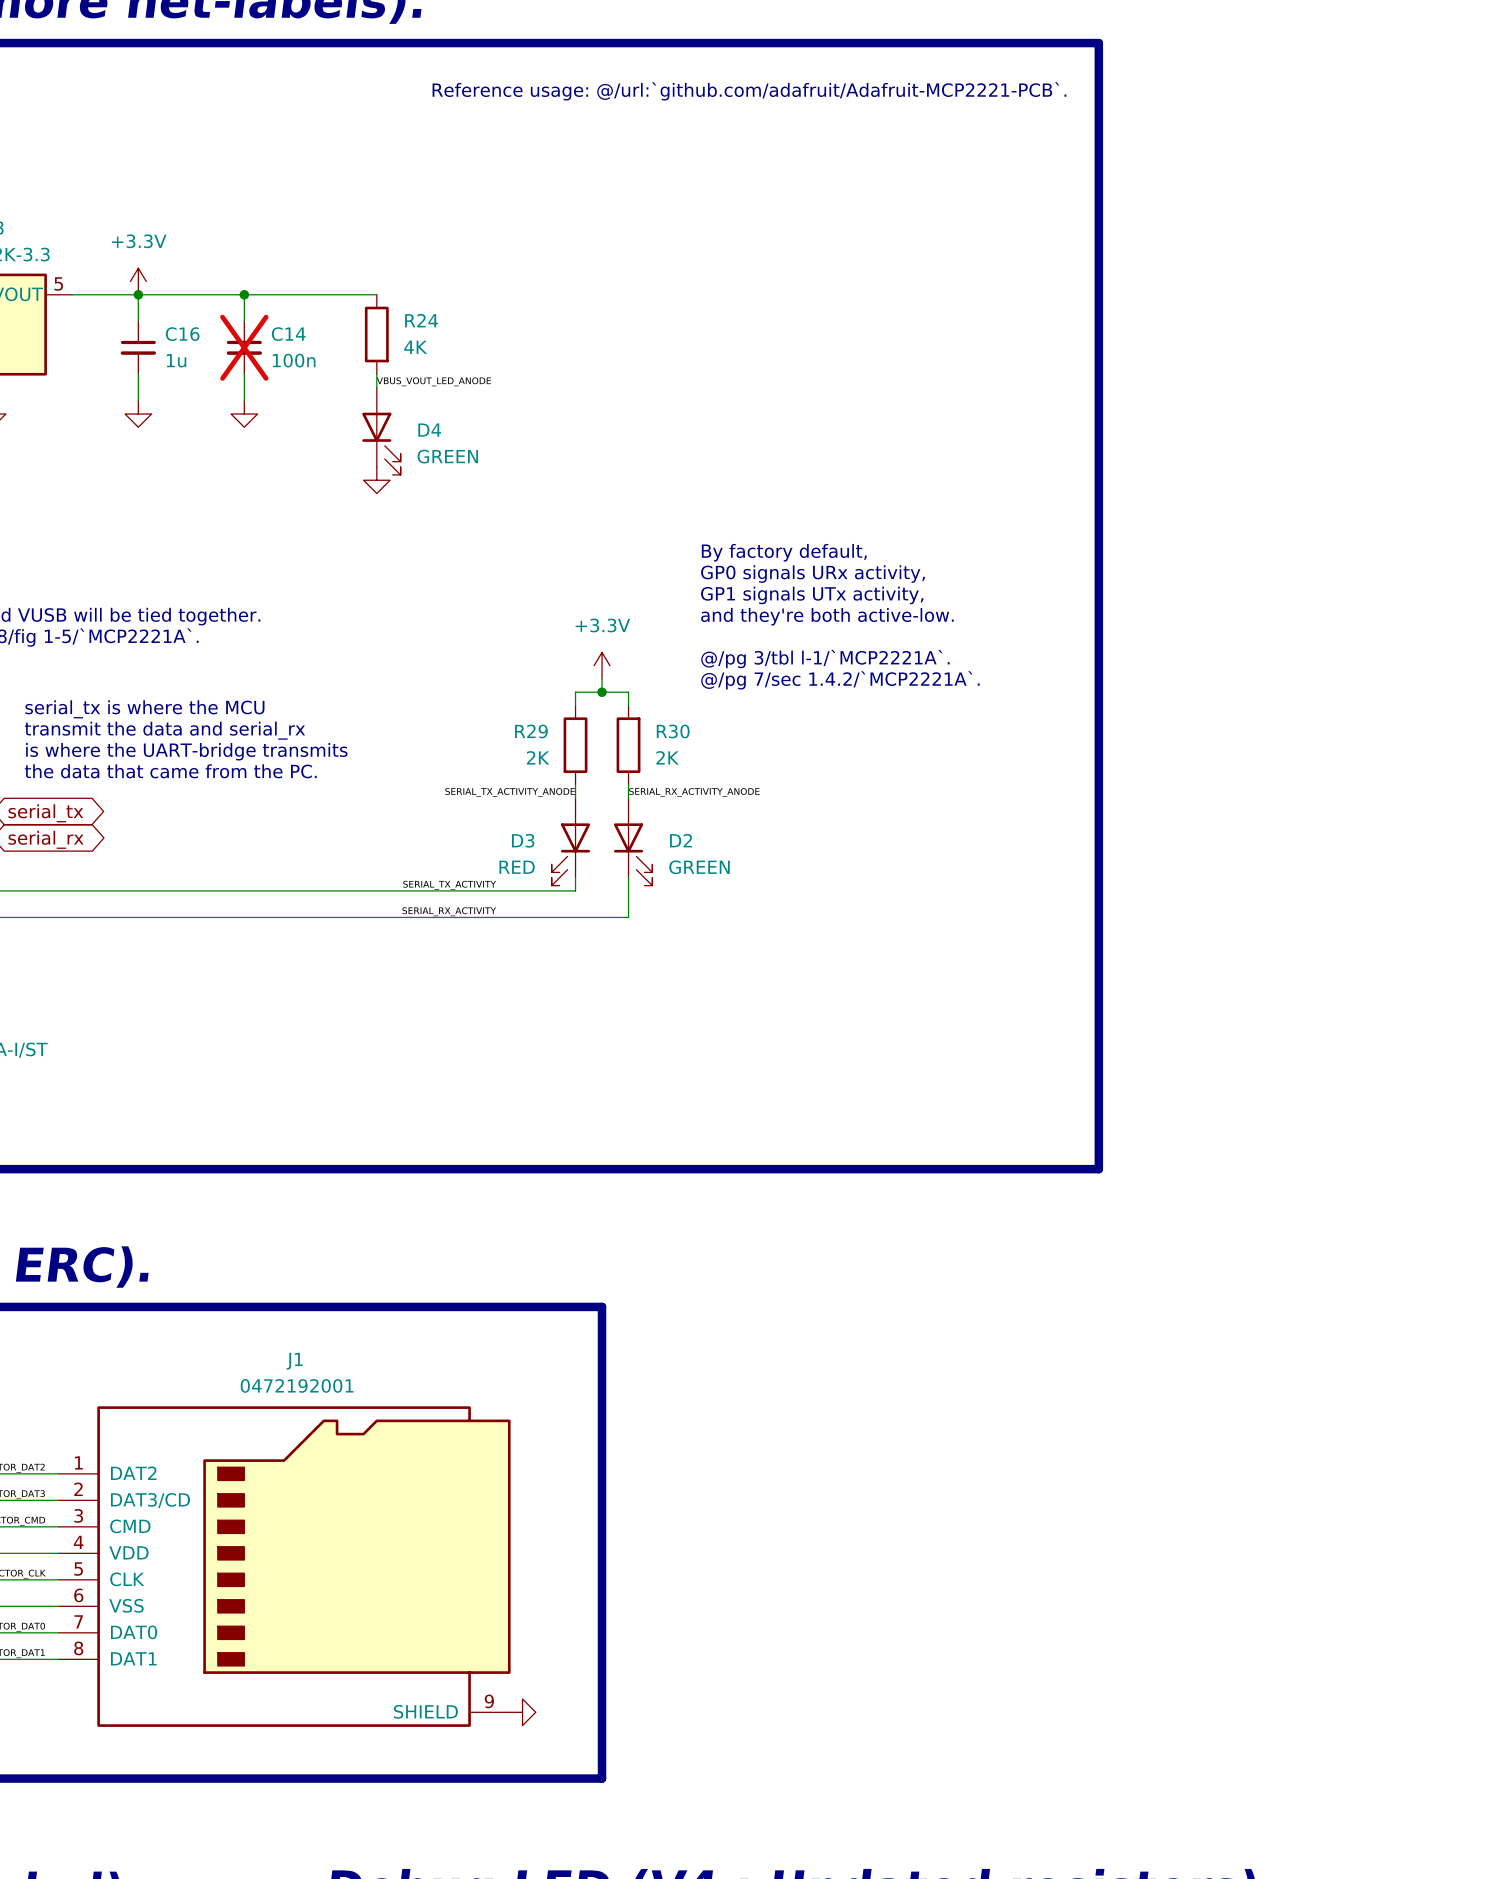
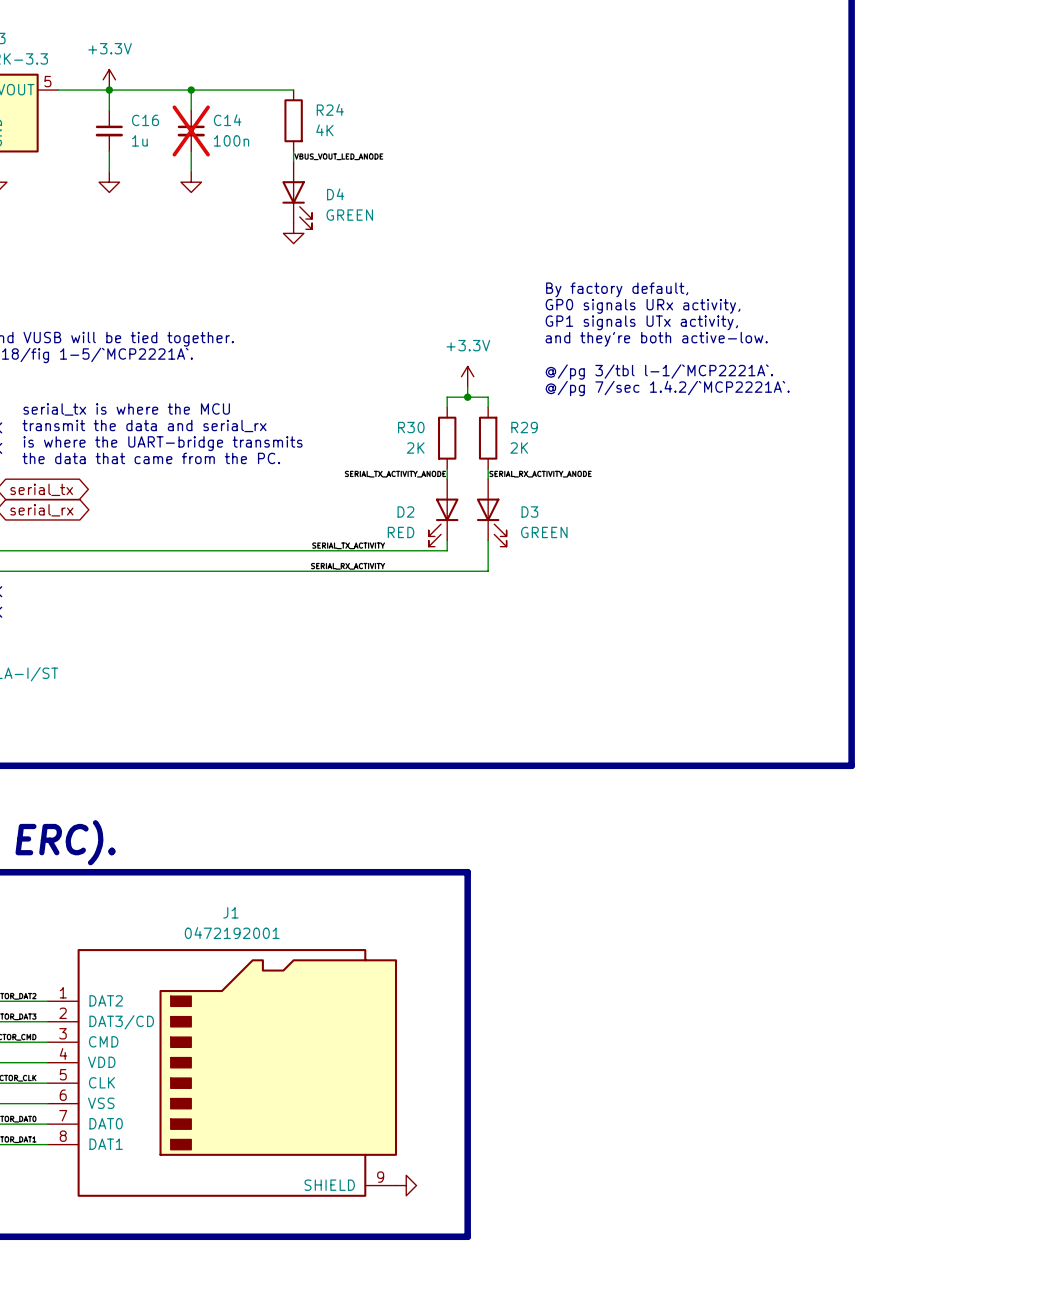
R29 name: R29 (531, 731) -> R30 (411, 427)
R30 name: R30 (673, 731) -> R29 (524, 427)
D3 name: D3 (523, 840) -> D2 (405, 511)
D2 name: D2 (681, 840) -> D3 (529, 511)

